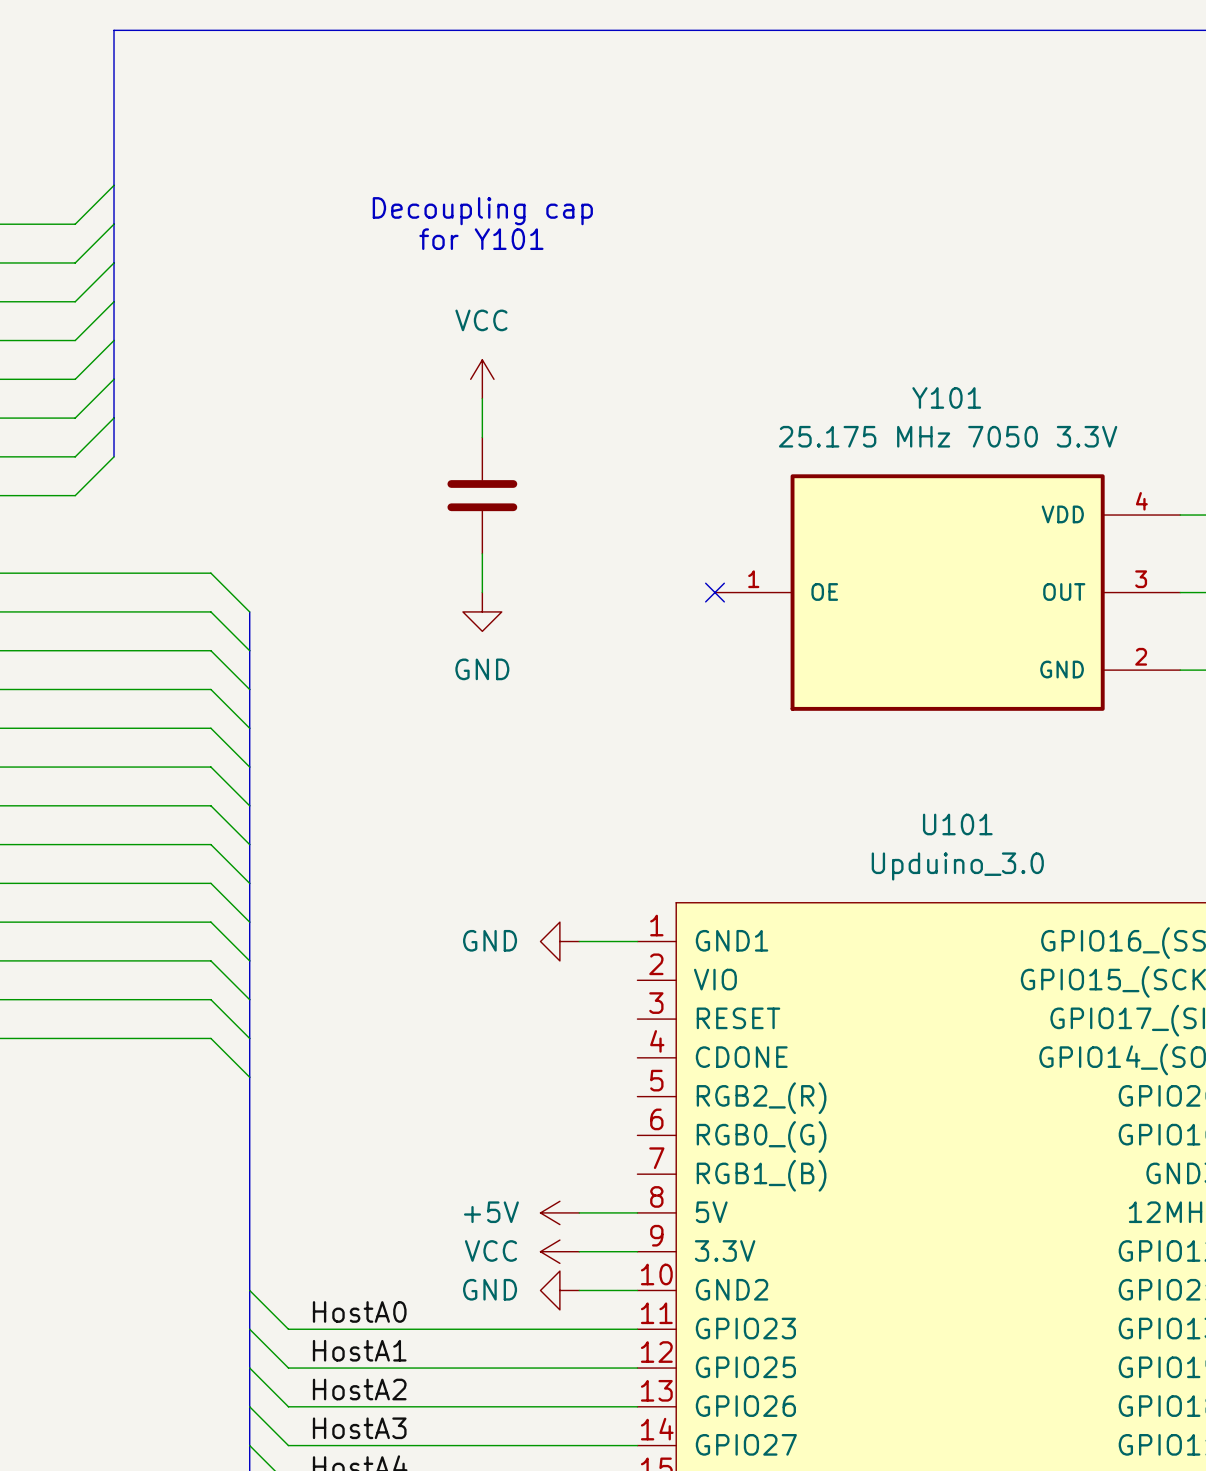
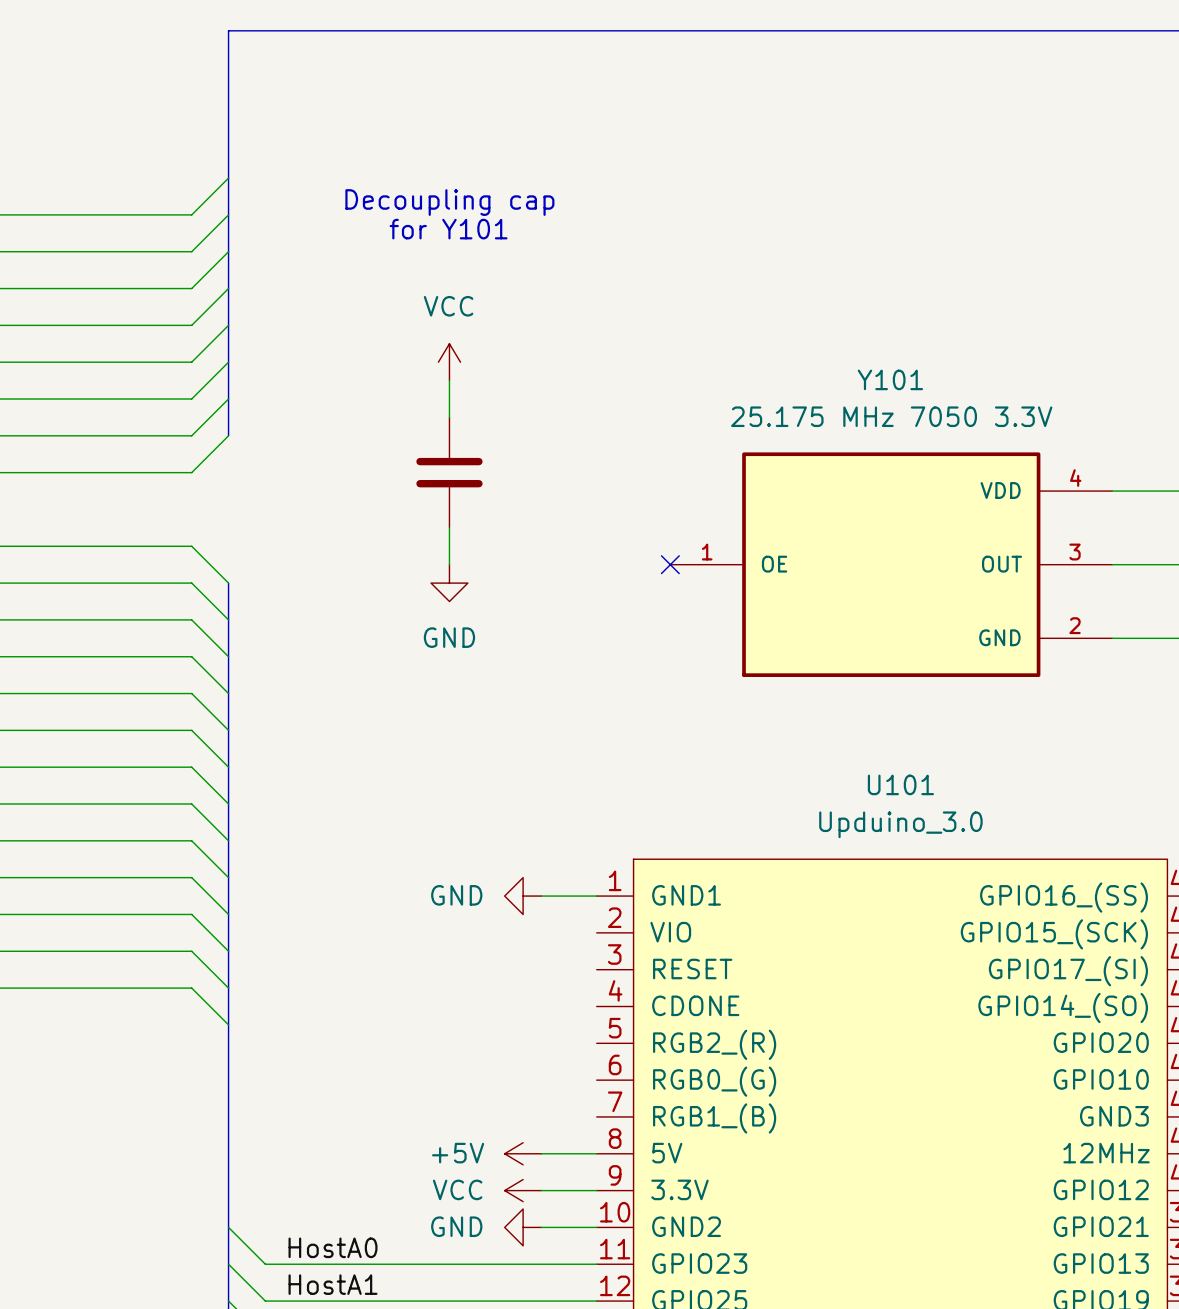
bus: (249, 30) (114, 30) (114, 456) -> (228, 30) (228, 435)
wire: (114, 185) (75, 224) -> (228, 178) (191, 214) (62, 214)
wire: (114, 224) (75, 262) -> (228, 214) (191, 251) (62, 251)
wire: (114, 262) (75, 301) -> (228, 251) (191, 288) (62, 288)
wire: (114, 301) (75, 340) -> (228, 288) (191, 325) (62, 325)
wire: (114, 340) (75, 379) -> (228, 325) (191, 362) (62, 362)
wire: (114, 379) (75, 418) -> (228, 362) (191, 399) (62, 399)
wire: (114, 418) (75, 456) -> (228, 399) (191, 435) (62, 435)
wire: (114, 456) (75, 495) -> (228, 435) (191, 472) (62, 472)

